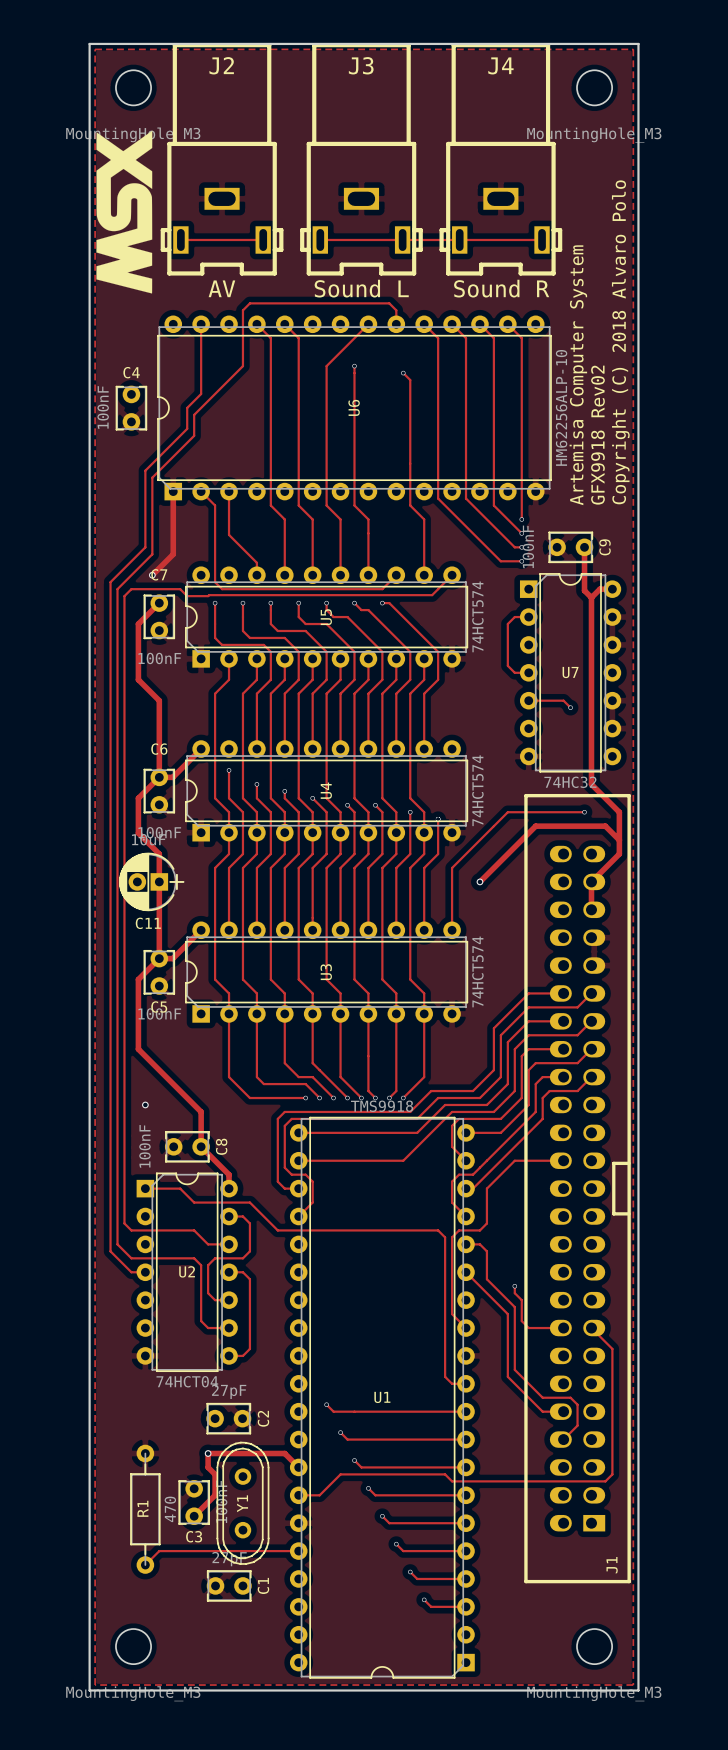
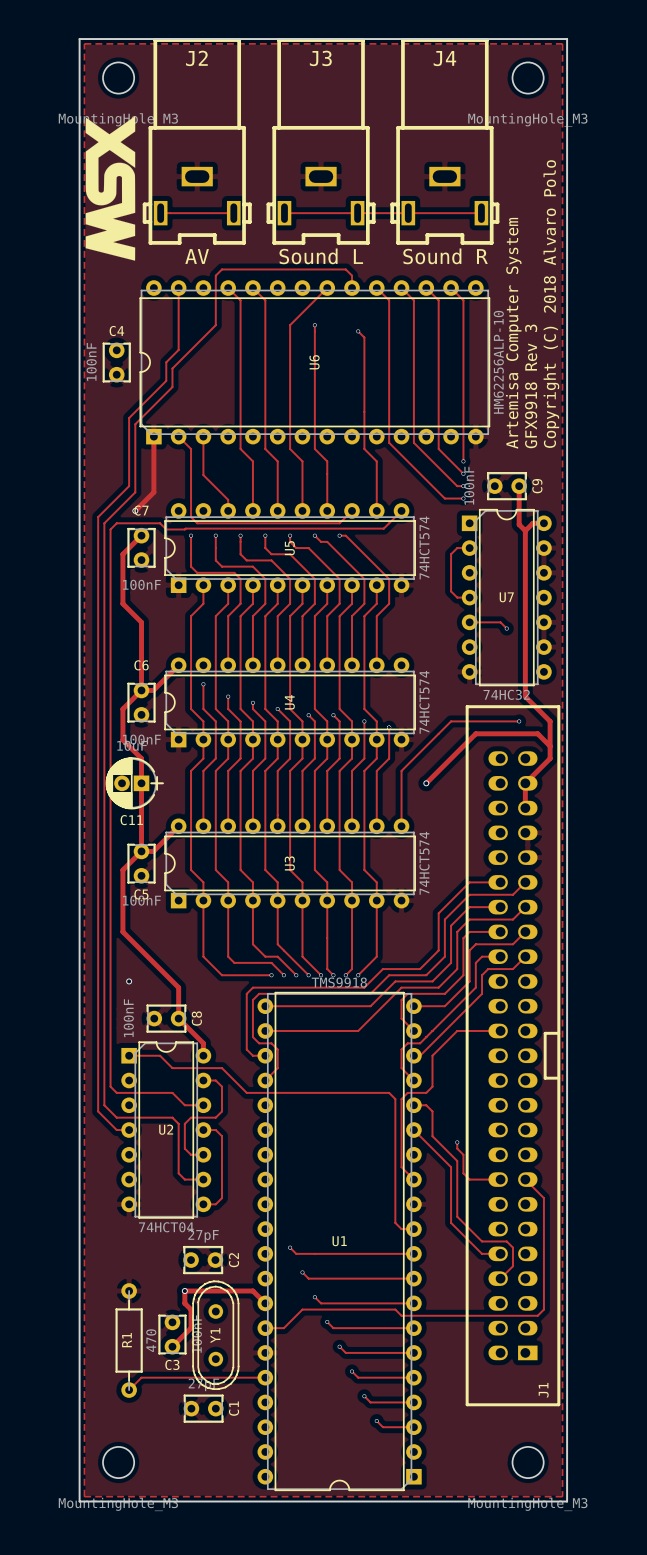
text: GFX9918 Rev02 (597, 435) -> GFX9918 Rev 3 (531, 386)

